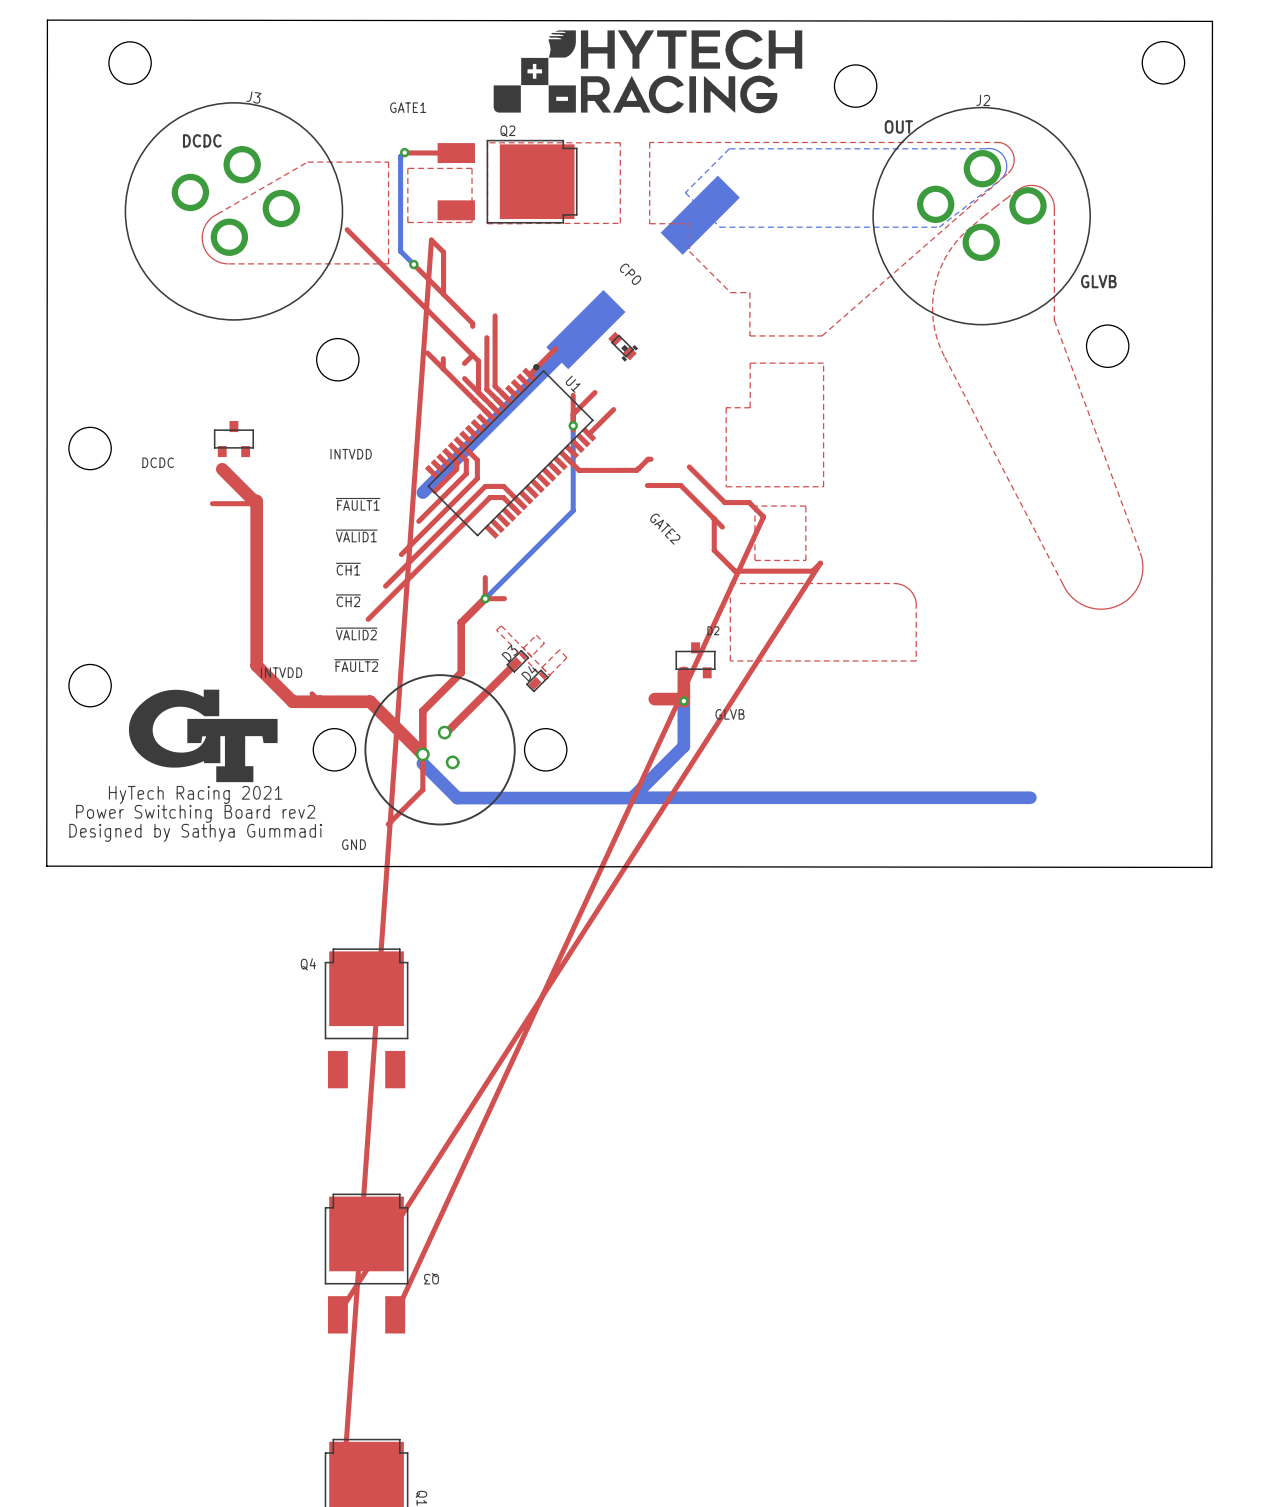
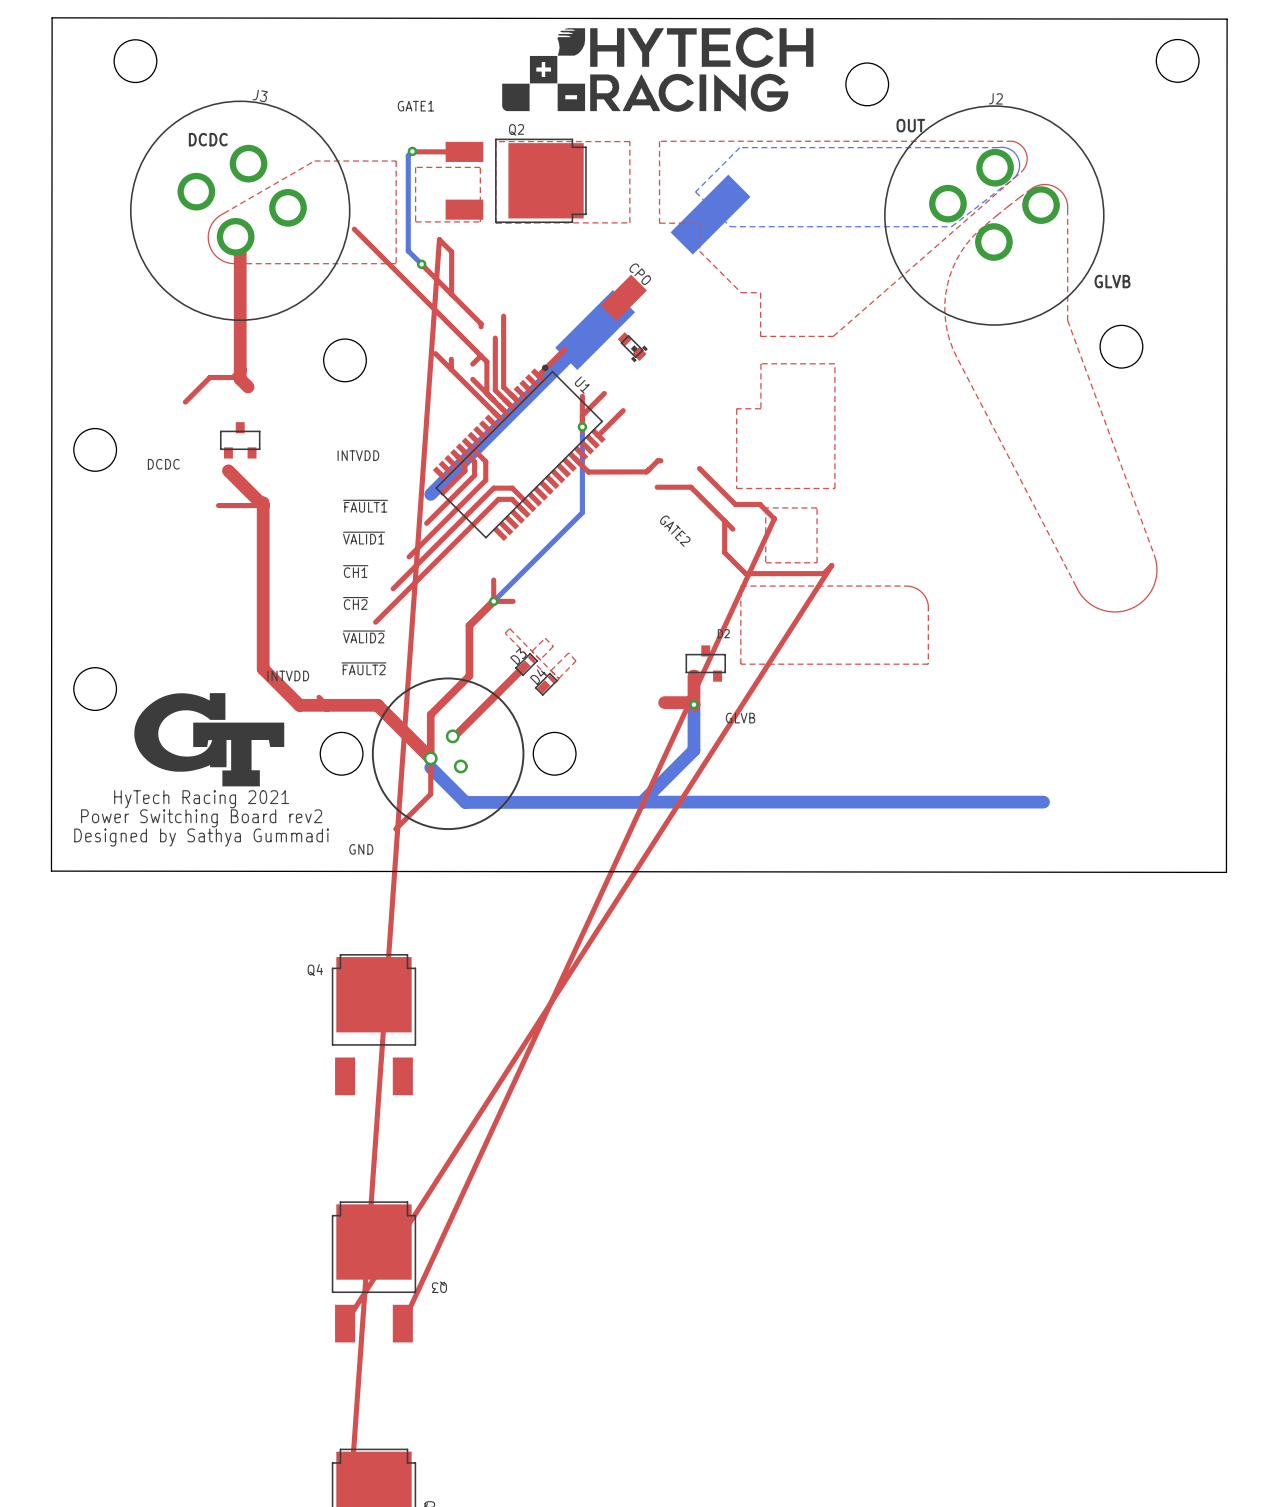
top track: none -> (235, 236) (240, 241) (240, 379) (248, 386)
part: none -> (623, 297)
top track: none -> (240, 370) (232, 377) (209, 377) (185, 402)

